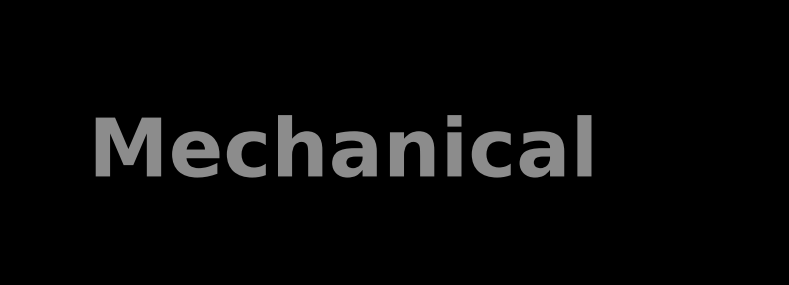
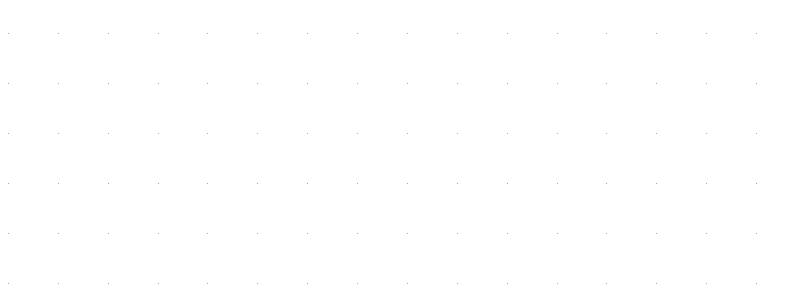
text: Mechanical (343, 146) -> none

